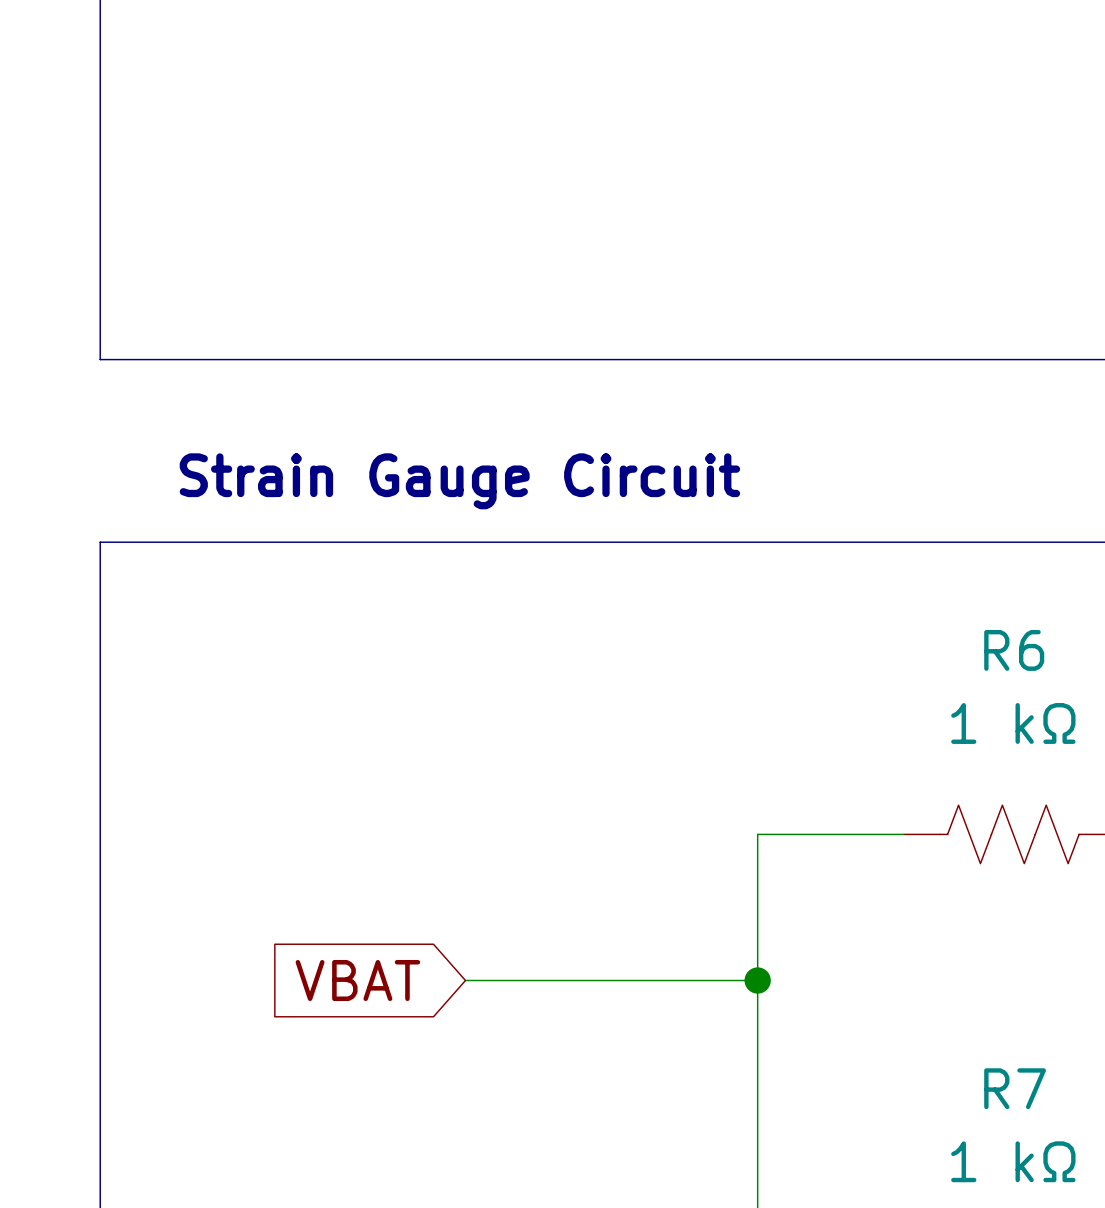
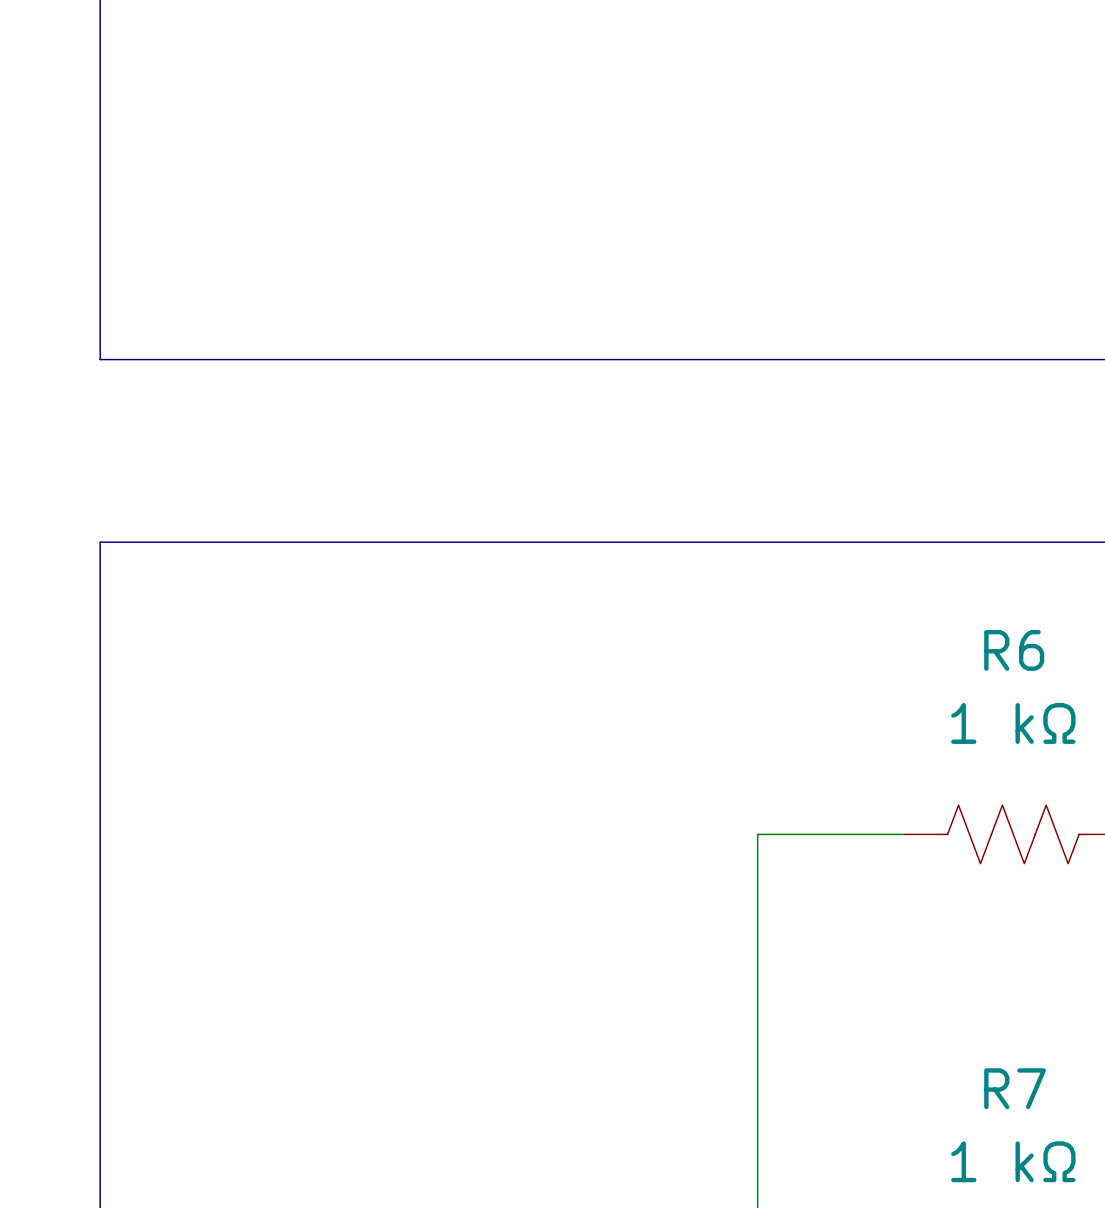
text: Strain Gauge Circuit (459, 481) -> none
global label: VBAT (357, 980) -> none
wire: (465, 980) (757, 980) -> none
junction: (757, 980) -> none

